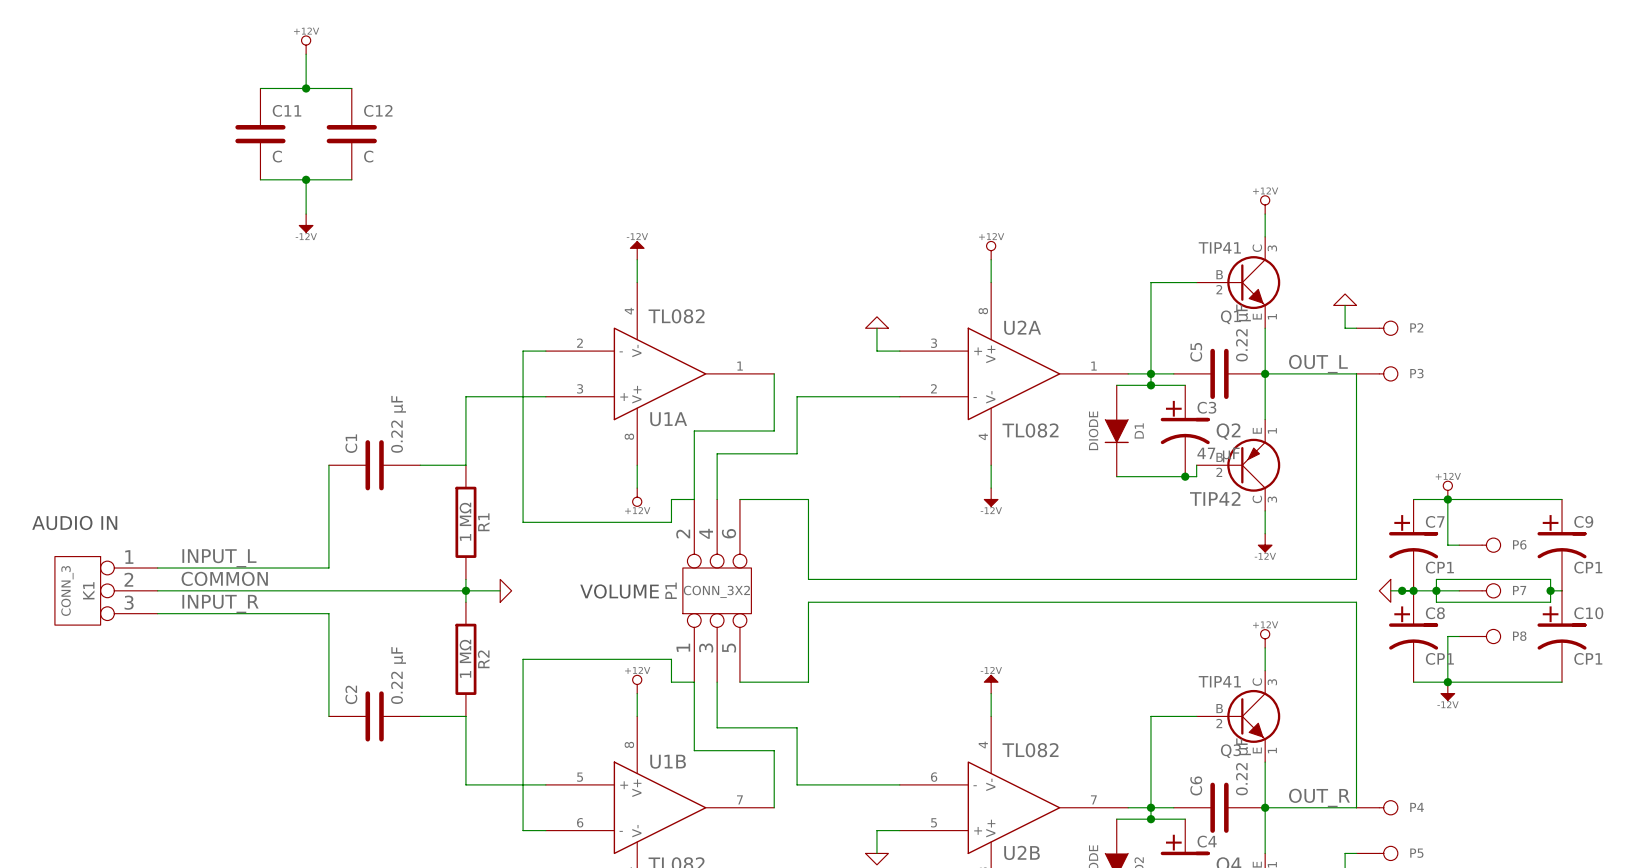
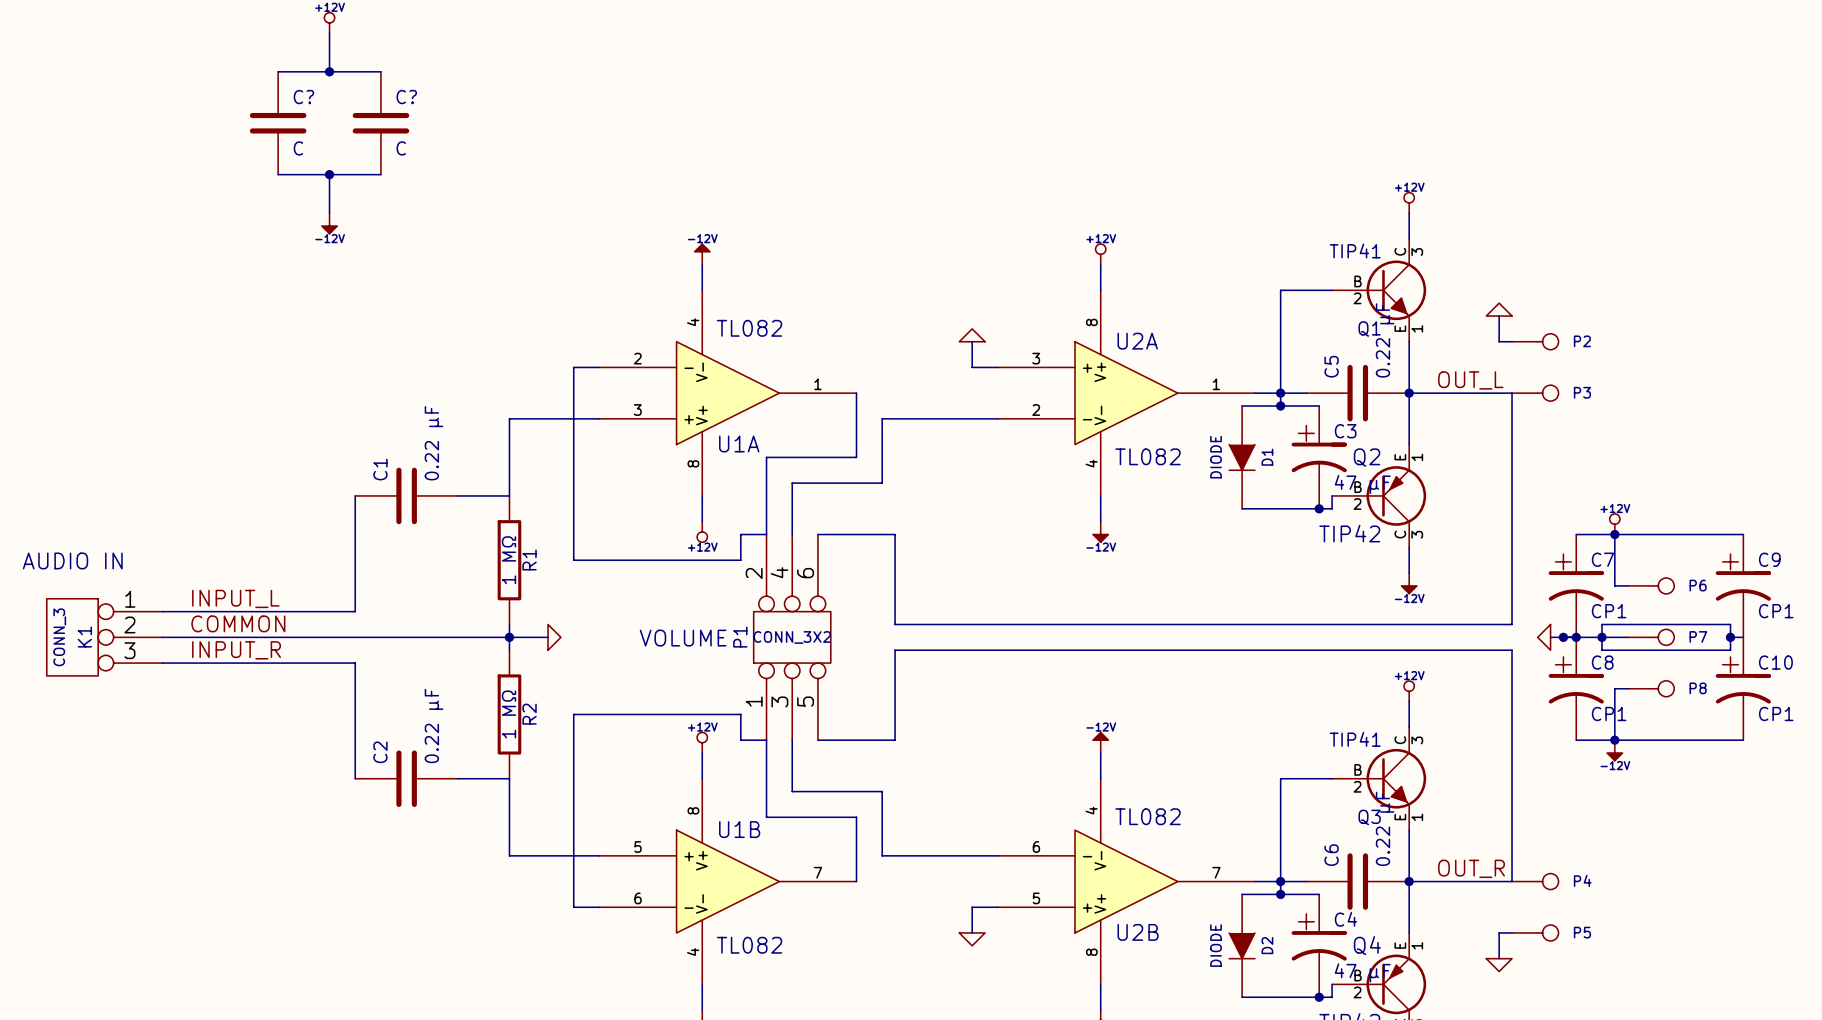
C11 name: C11 (287, 110) -> C? (303, 97)
C12 name: C12 (378, 110) -> C? (406, 97)

